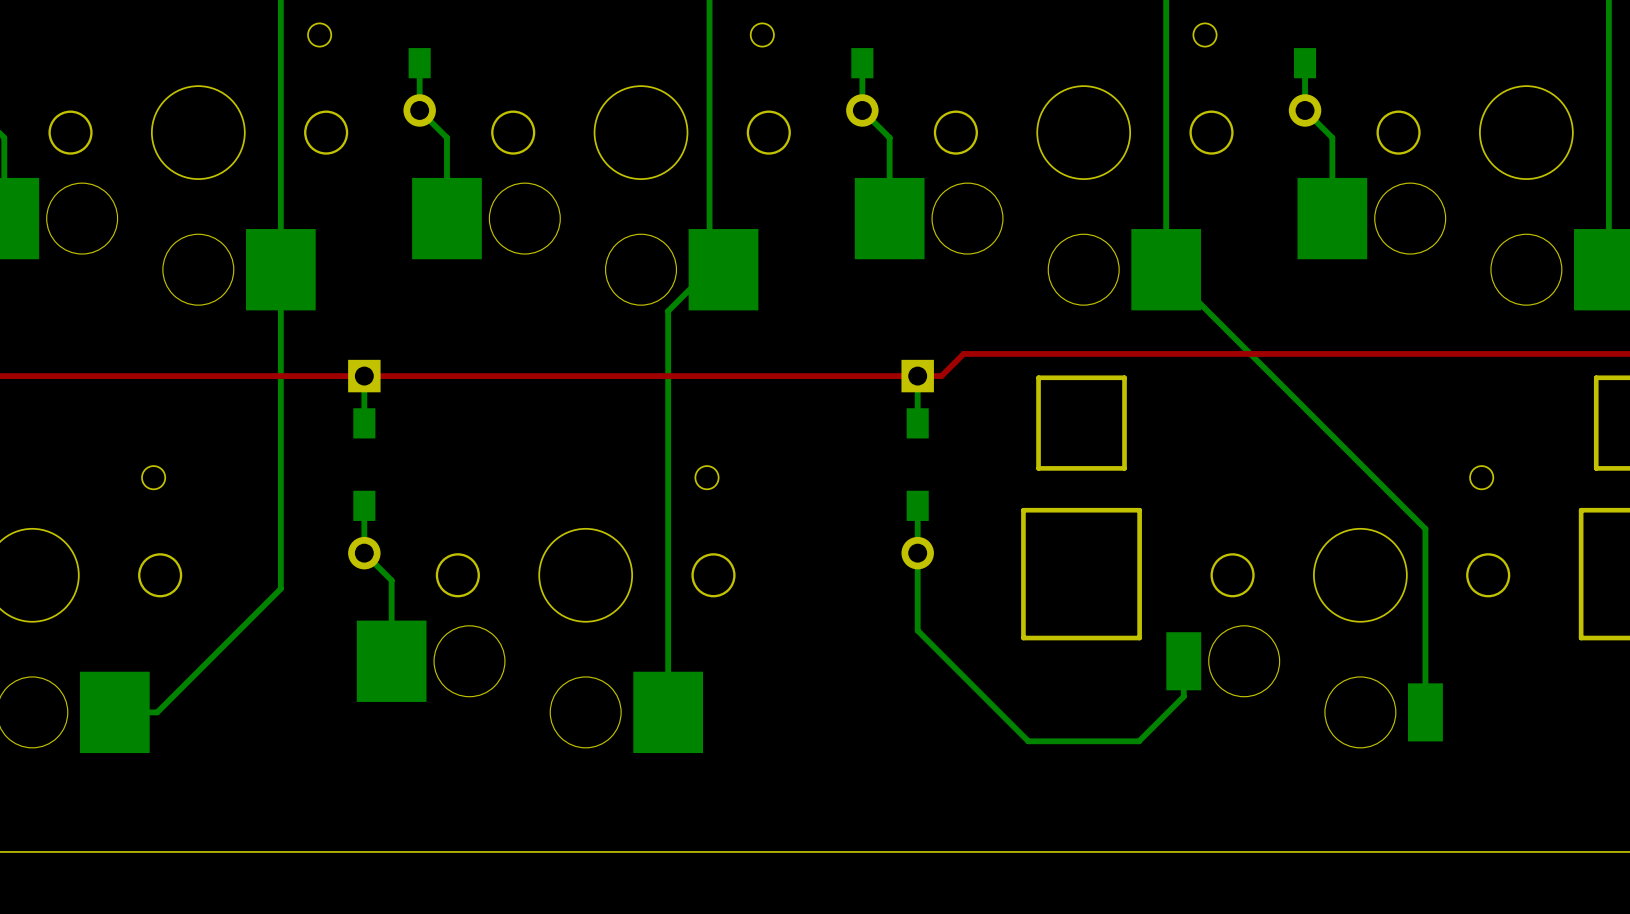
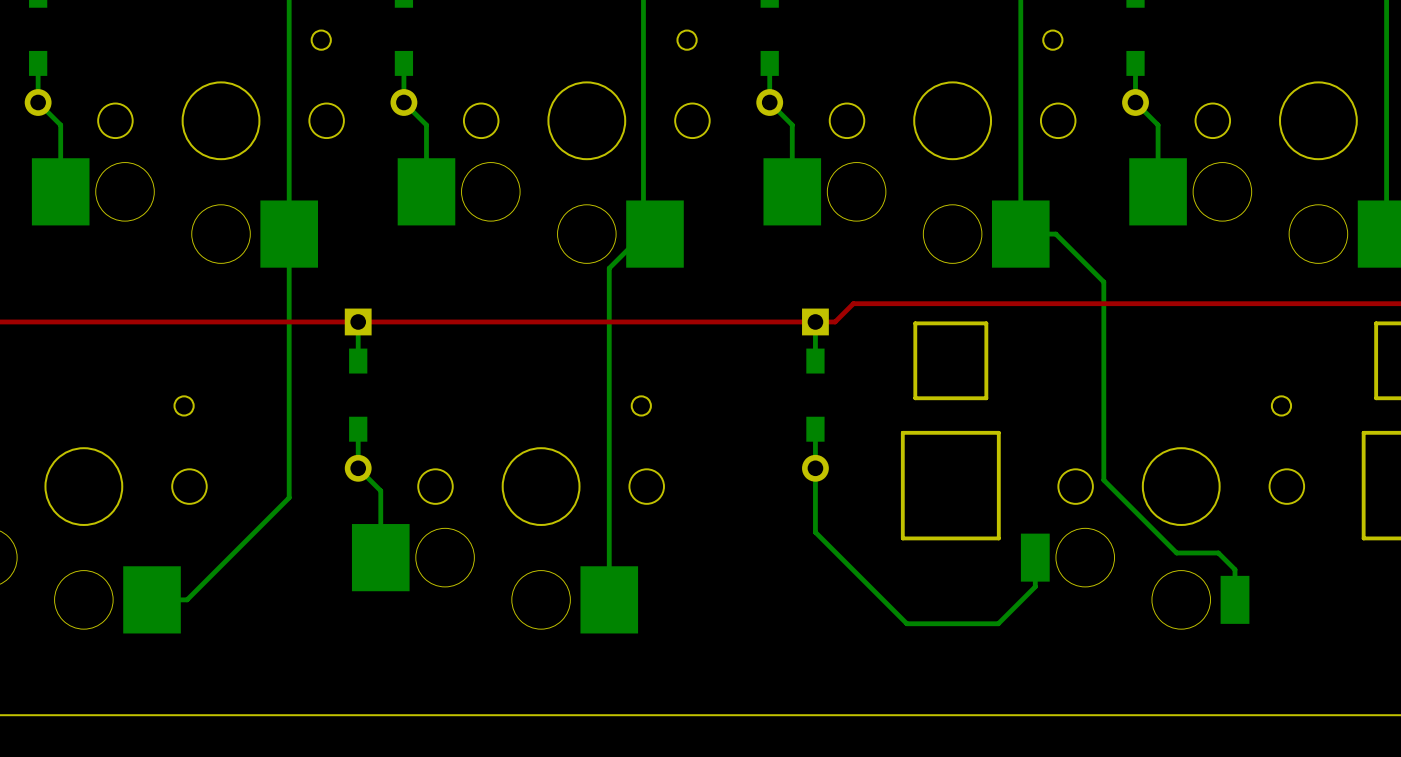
bottom track: (1166, 269) (1425, 528) (1425, 675) -> (1020, 234) (1055, 234) (1103, 282) (1103, 480) (1176, 553) (1218, 553) (1235, 569)

